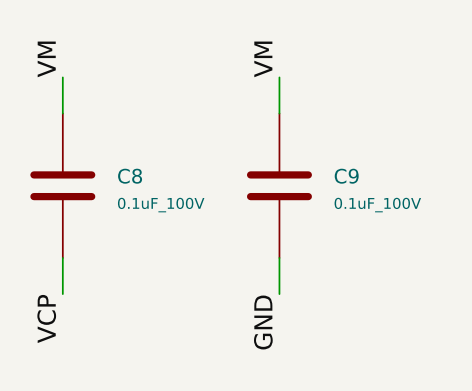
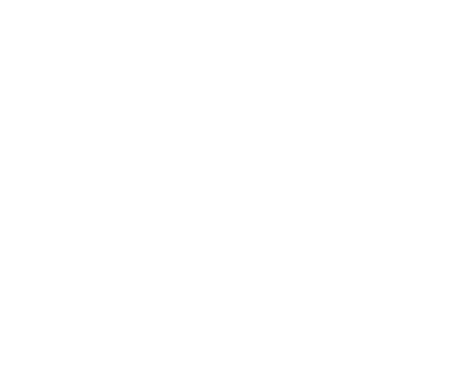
label: VM (46, 59) -> none
label: VM (263, 59) -> none
wire: (62, 77) (62, 113) -> none
wire: (279, 77) (279, 113) -> none
C8: 0.1uF_100V (62, 185) -> none
C9: 0.1uF_100V (279, 185) -> none
wire: (62, 257) (62, 294) -> none
wire: (279, 257) (279, 294) -> none
label: VCP (46, 318) -> none
label: GND (263, 322) -> none

